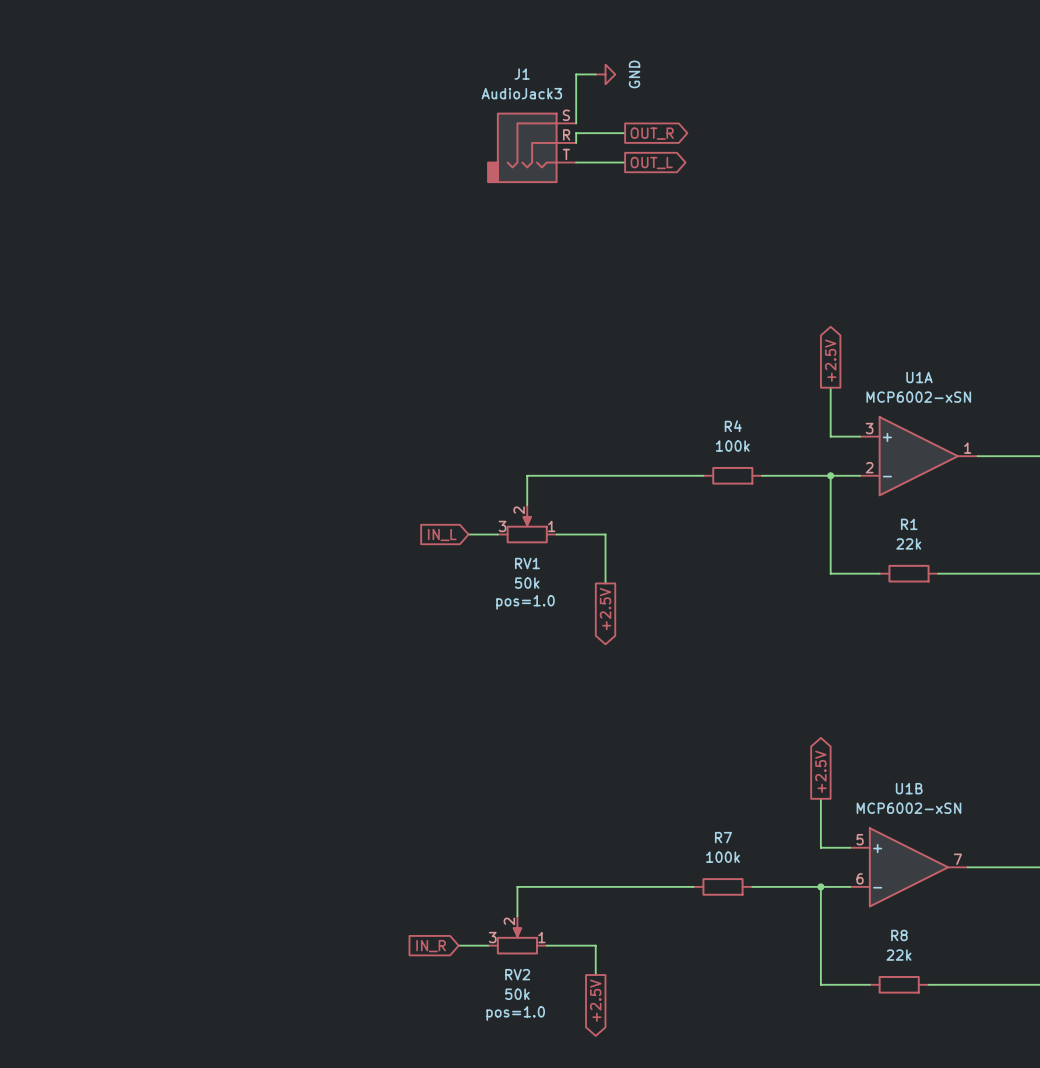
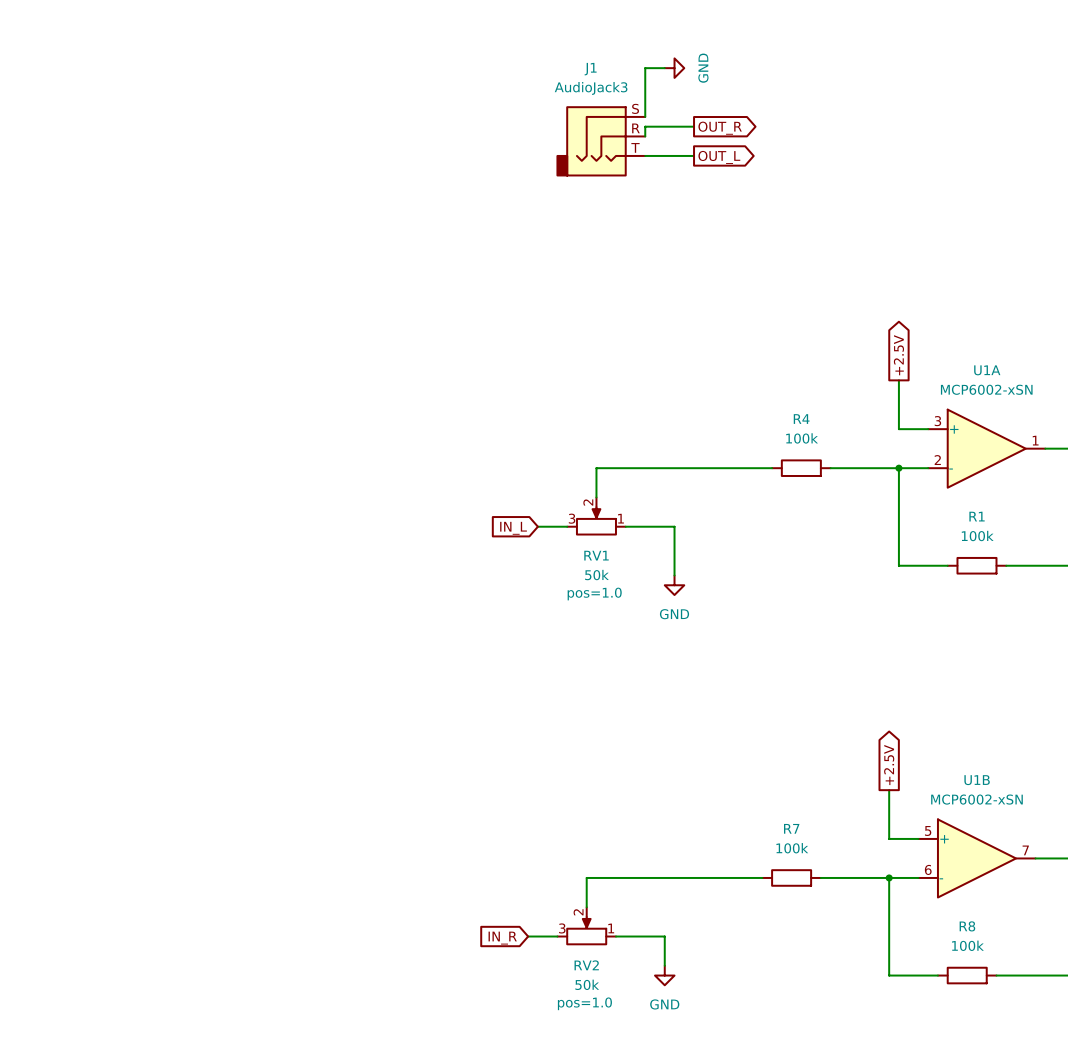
R1 value: 22k (908, 543) -> 100k (977, 536)
power symbol: none -> GND (674, 585)
global label: +2.5V (605, 609) -> none
R8 value: 22k (898, 955) -> 100k (967, 945)
power symbol: none -> GND (664, 975)
global label: +2.5V (595, 1000) -> none

